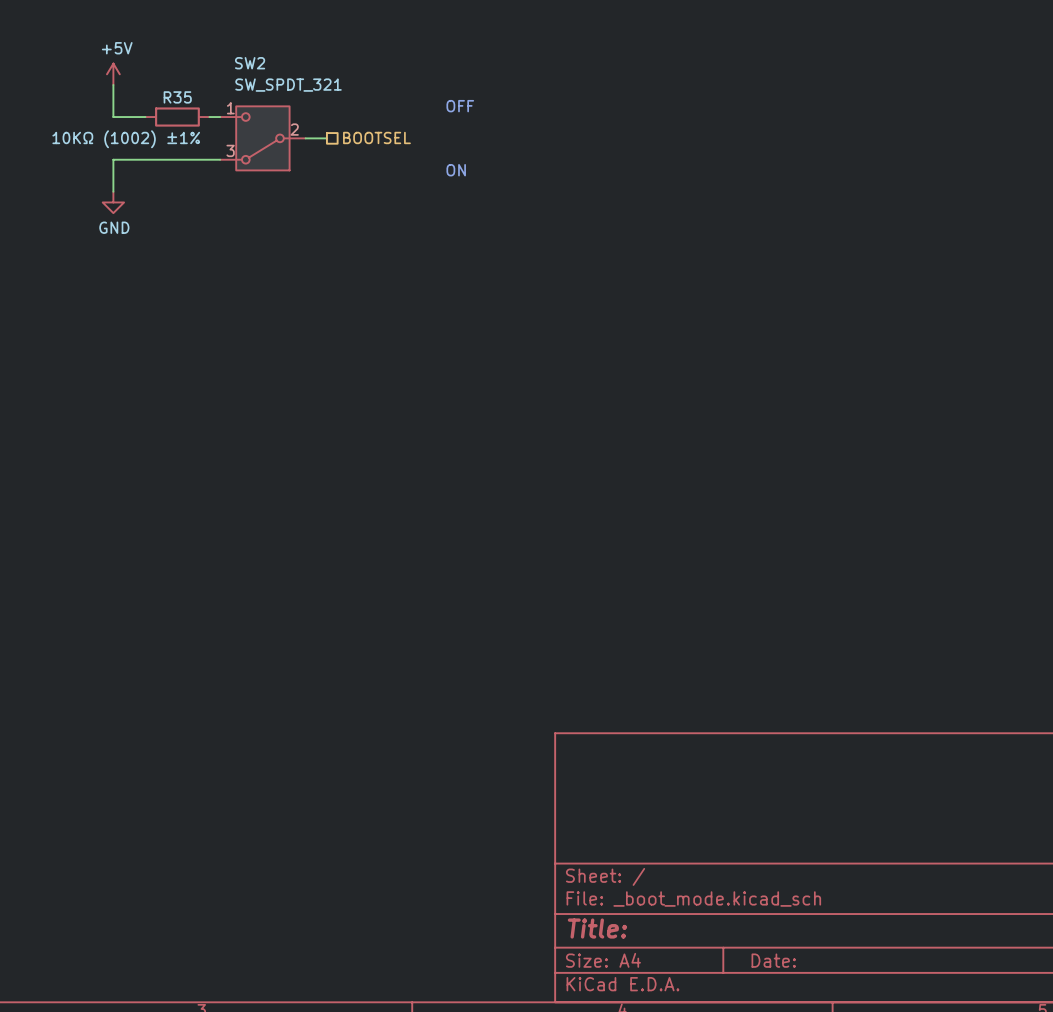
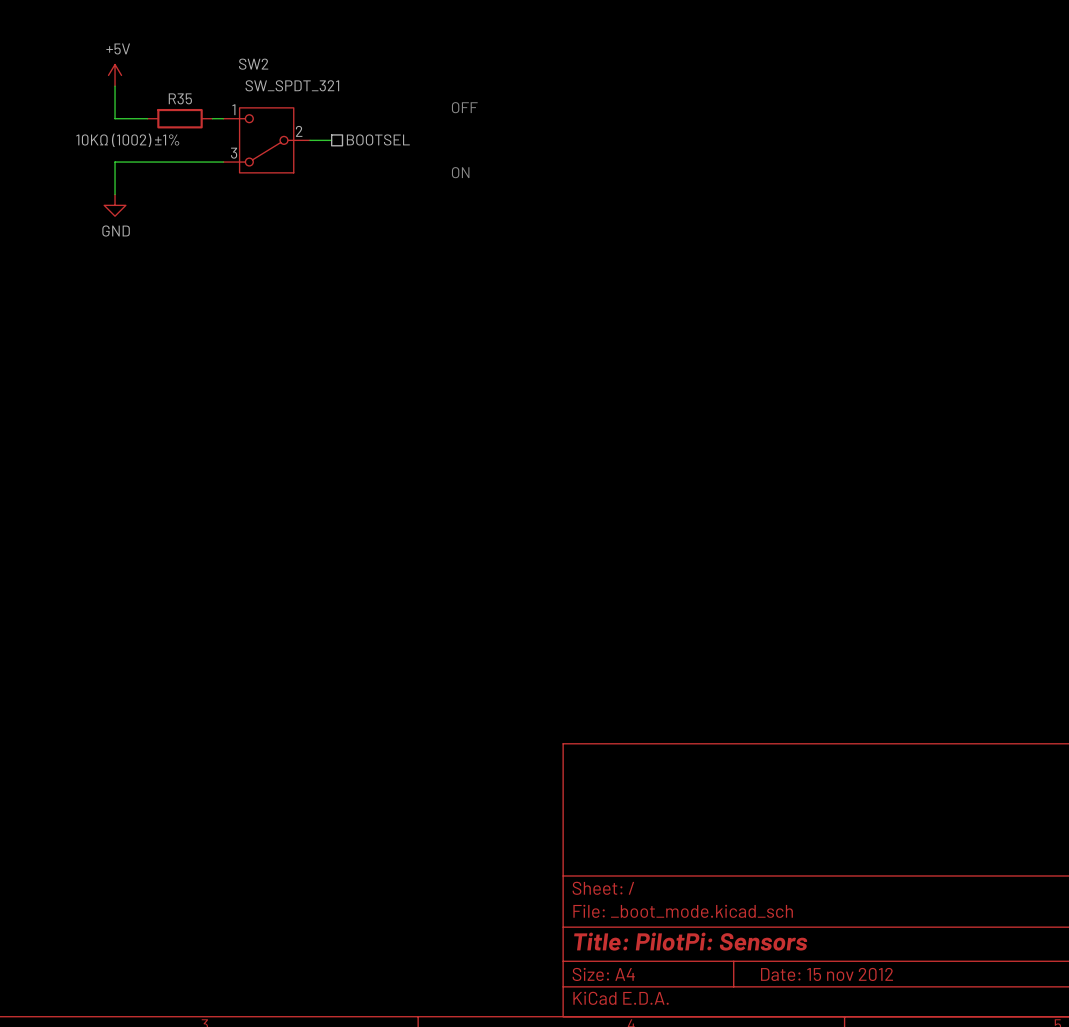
title block: Title: (597, 928) -> Title: PilotPi: Sensors (690, 941)
title block: Date: (773, 960) -> Date: 15 nov 2012 (827, 974)

